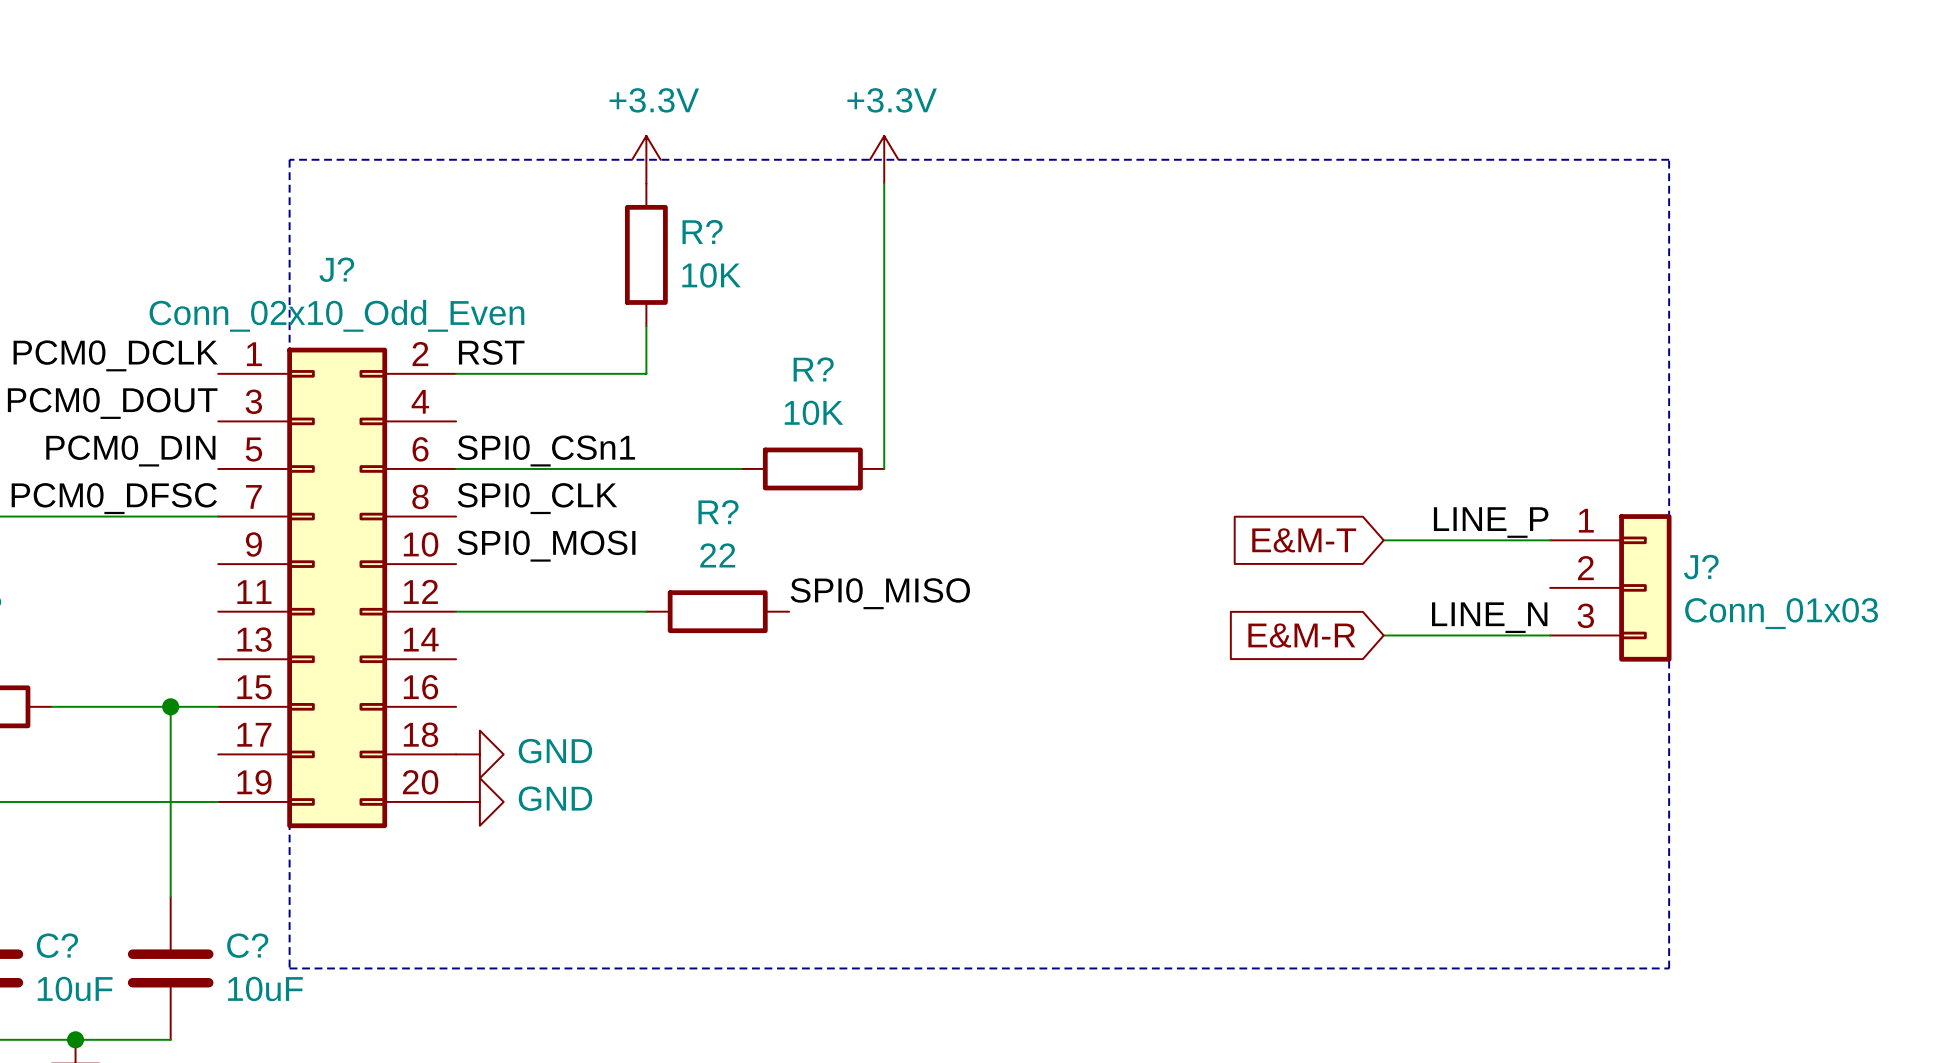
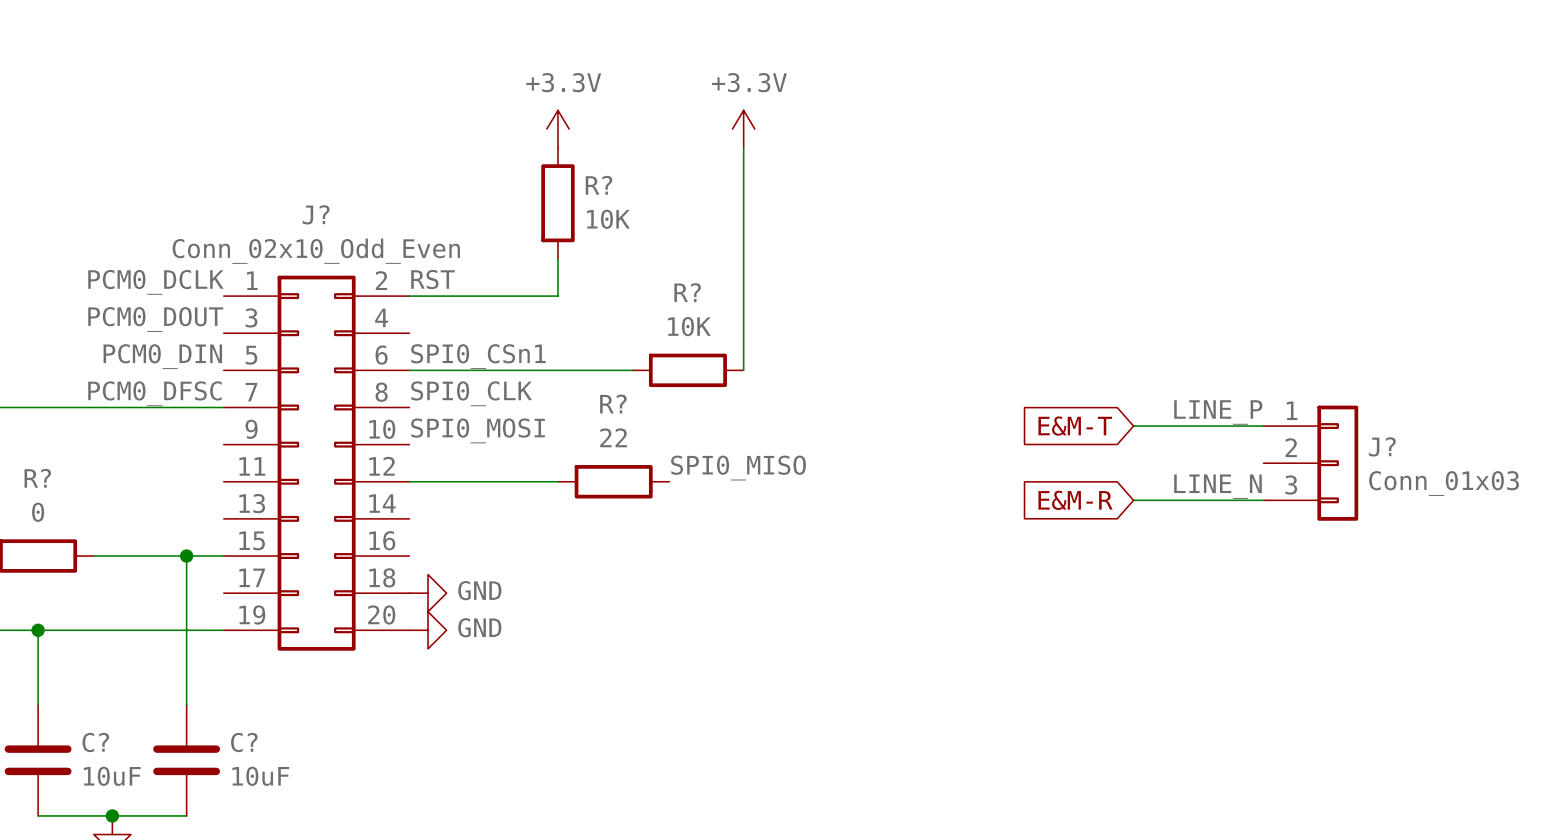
line: (289, 159) (289, 968) (1669, 968) (1669, 159) (289, 159) -> none

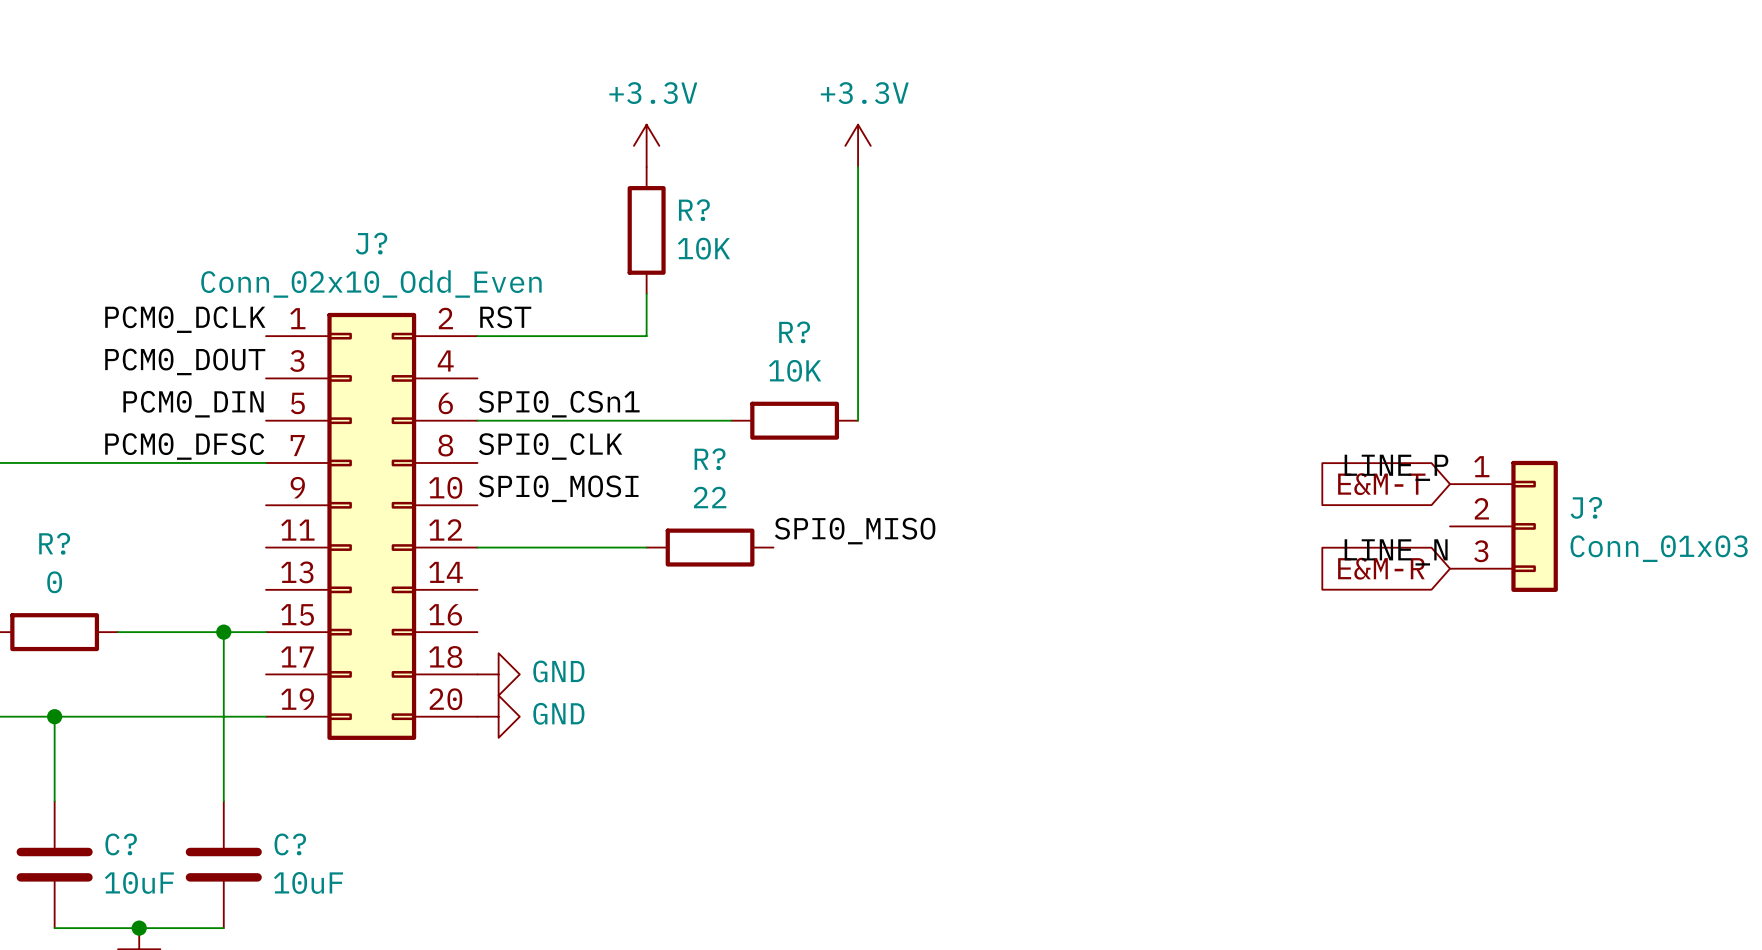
global label position: E&M-T (1075, 426) -> E&M-T (1381, 484)
wire: (1133, 426) (1263, 426) -> none
global label position: E&M-R (1075, 500) -> E&M-R (1381, 568)
wire: (1133, 500) (1263, 500) -> none

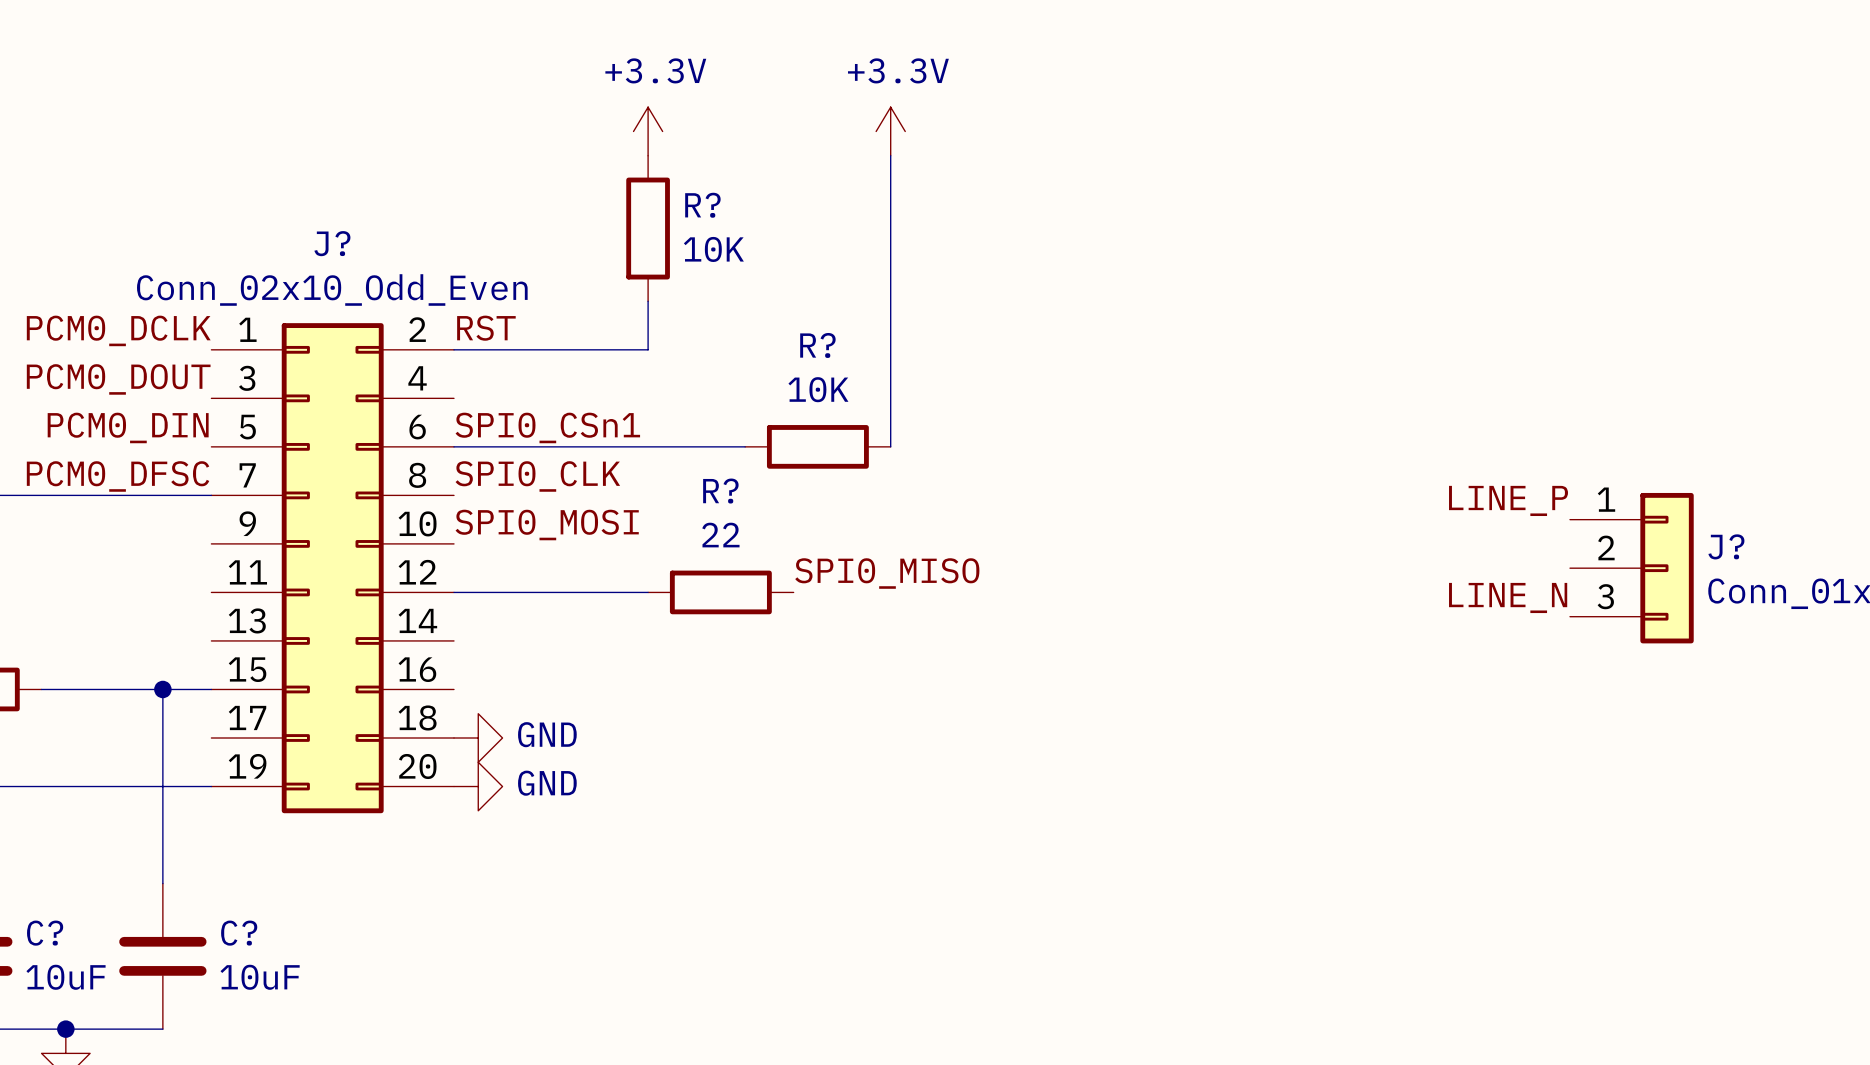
global label: E&M-T (1381, 484) -> none
global label: E&M-R (1381, 568) -> none

